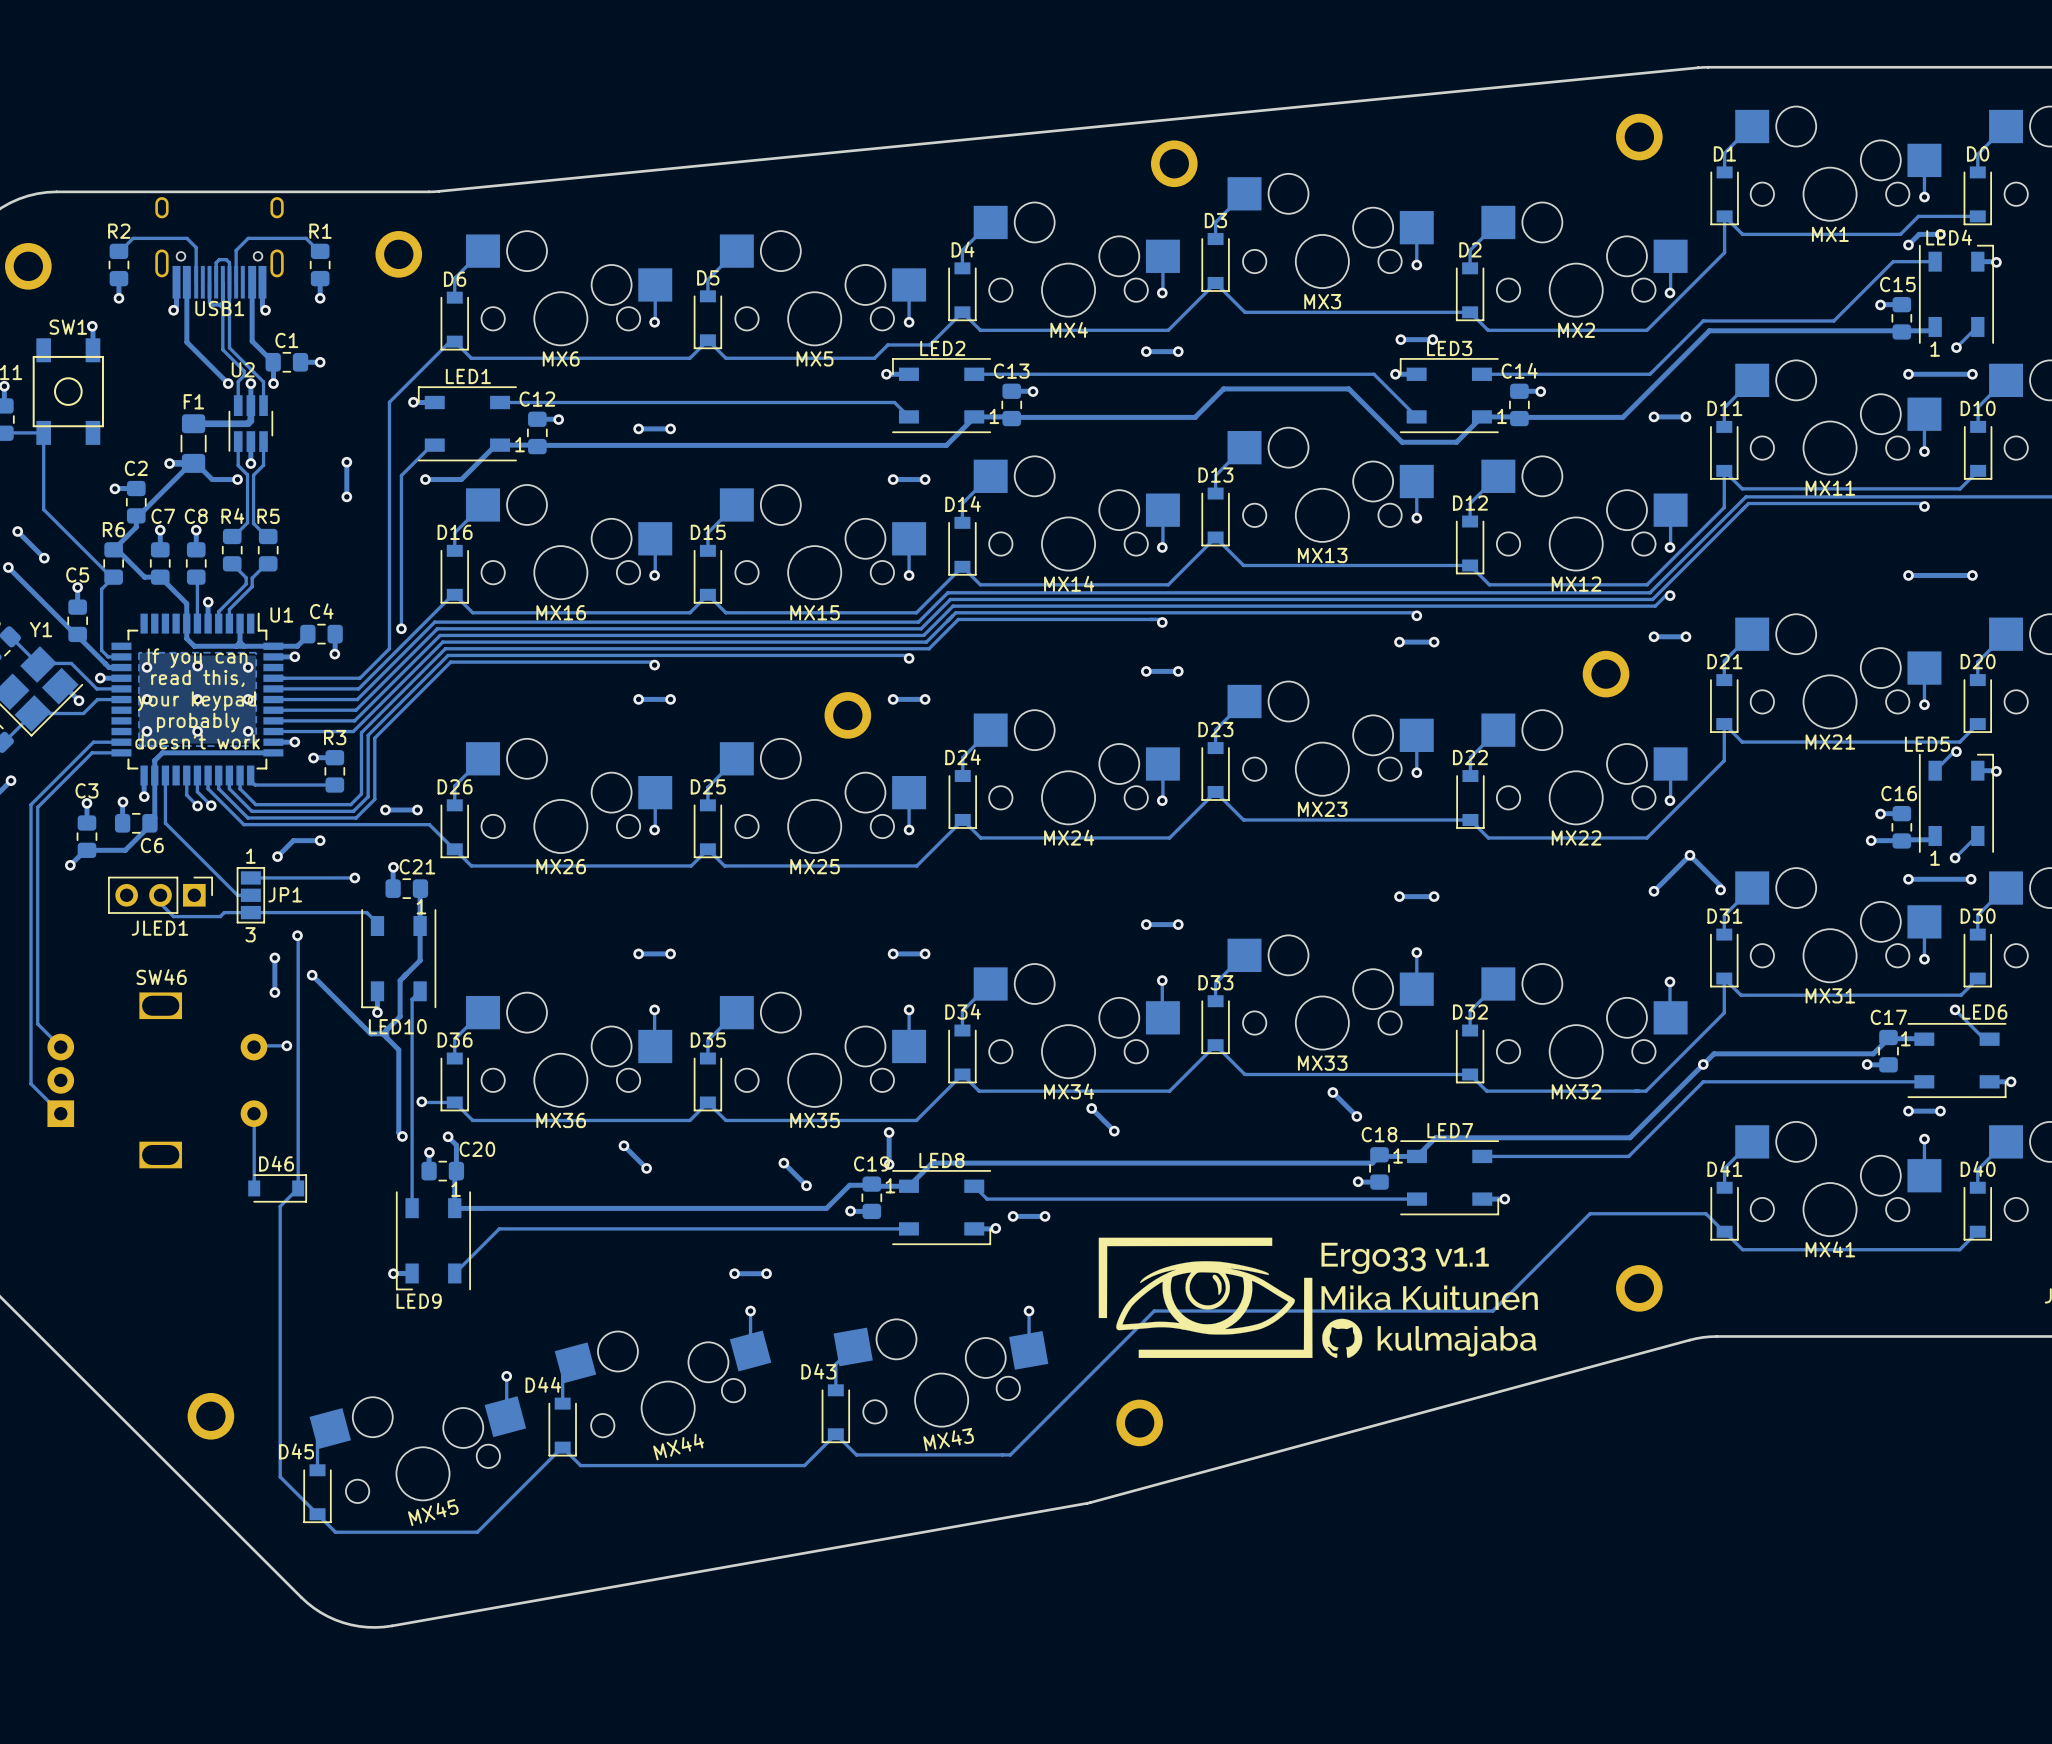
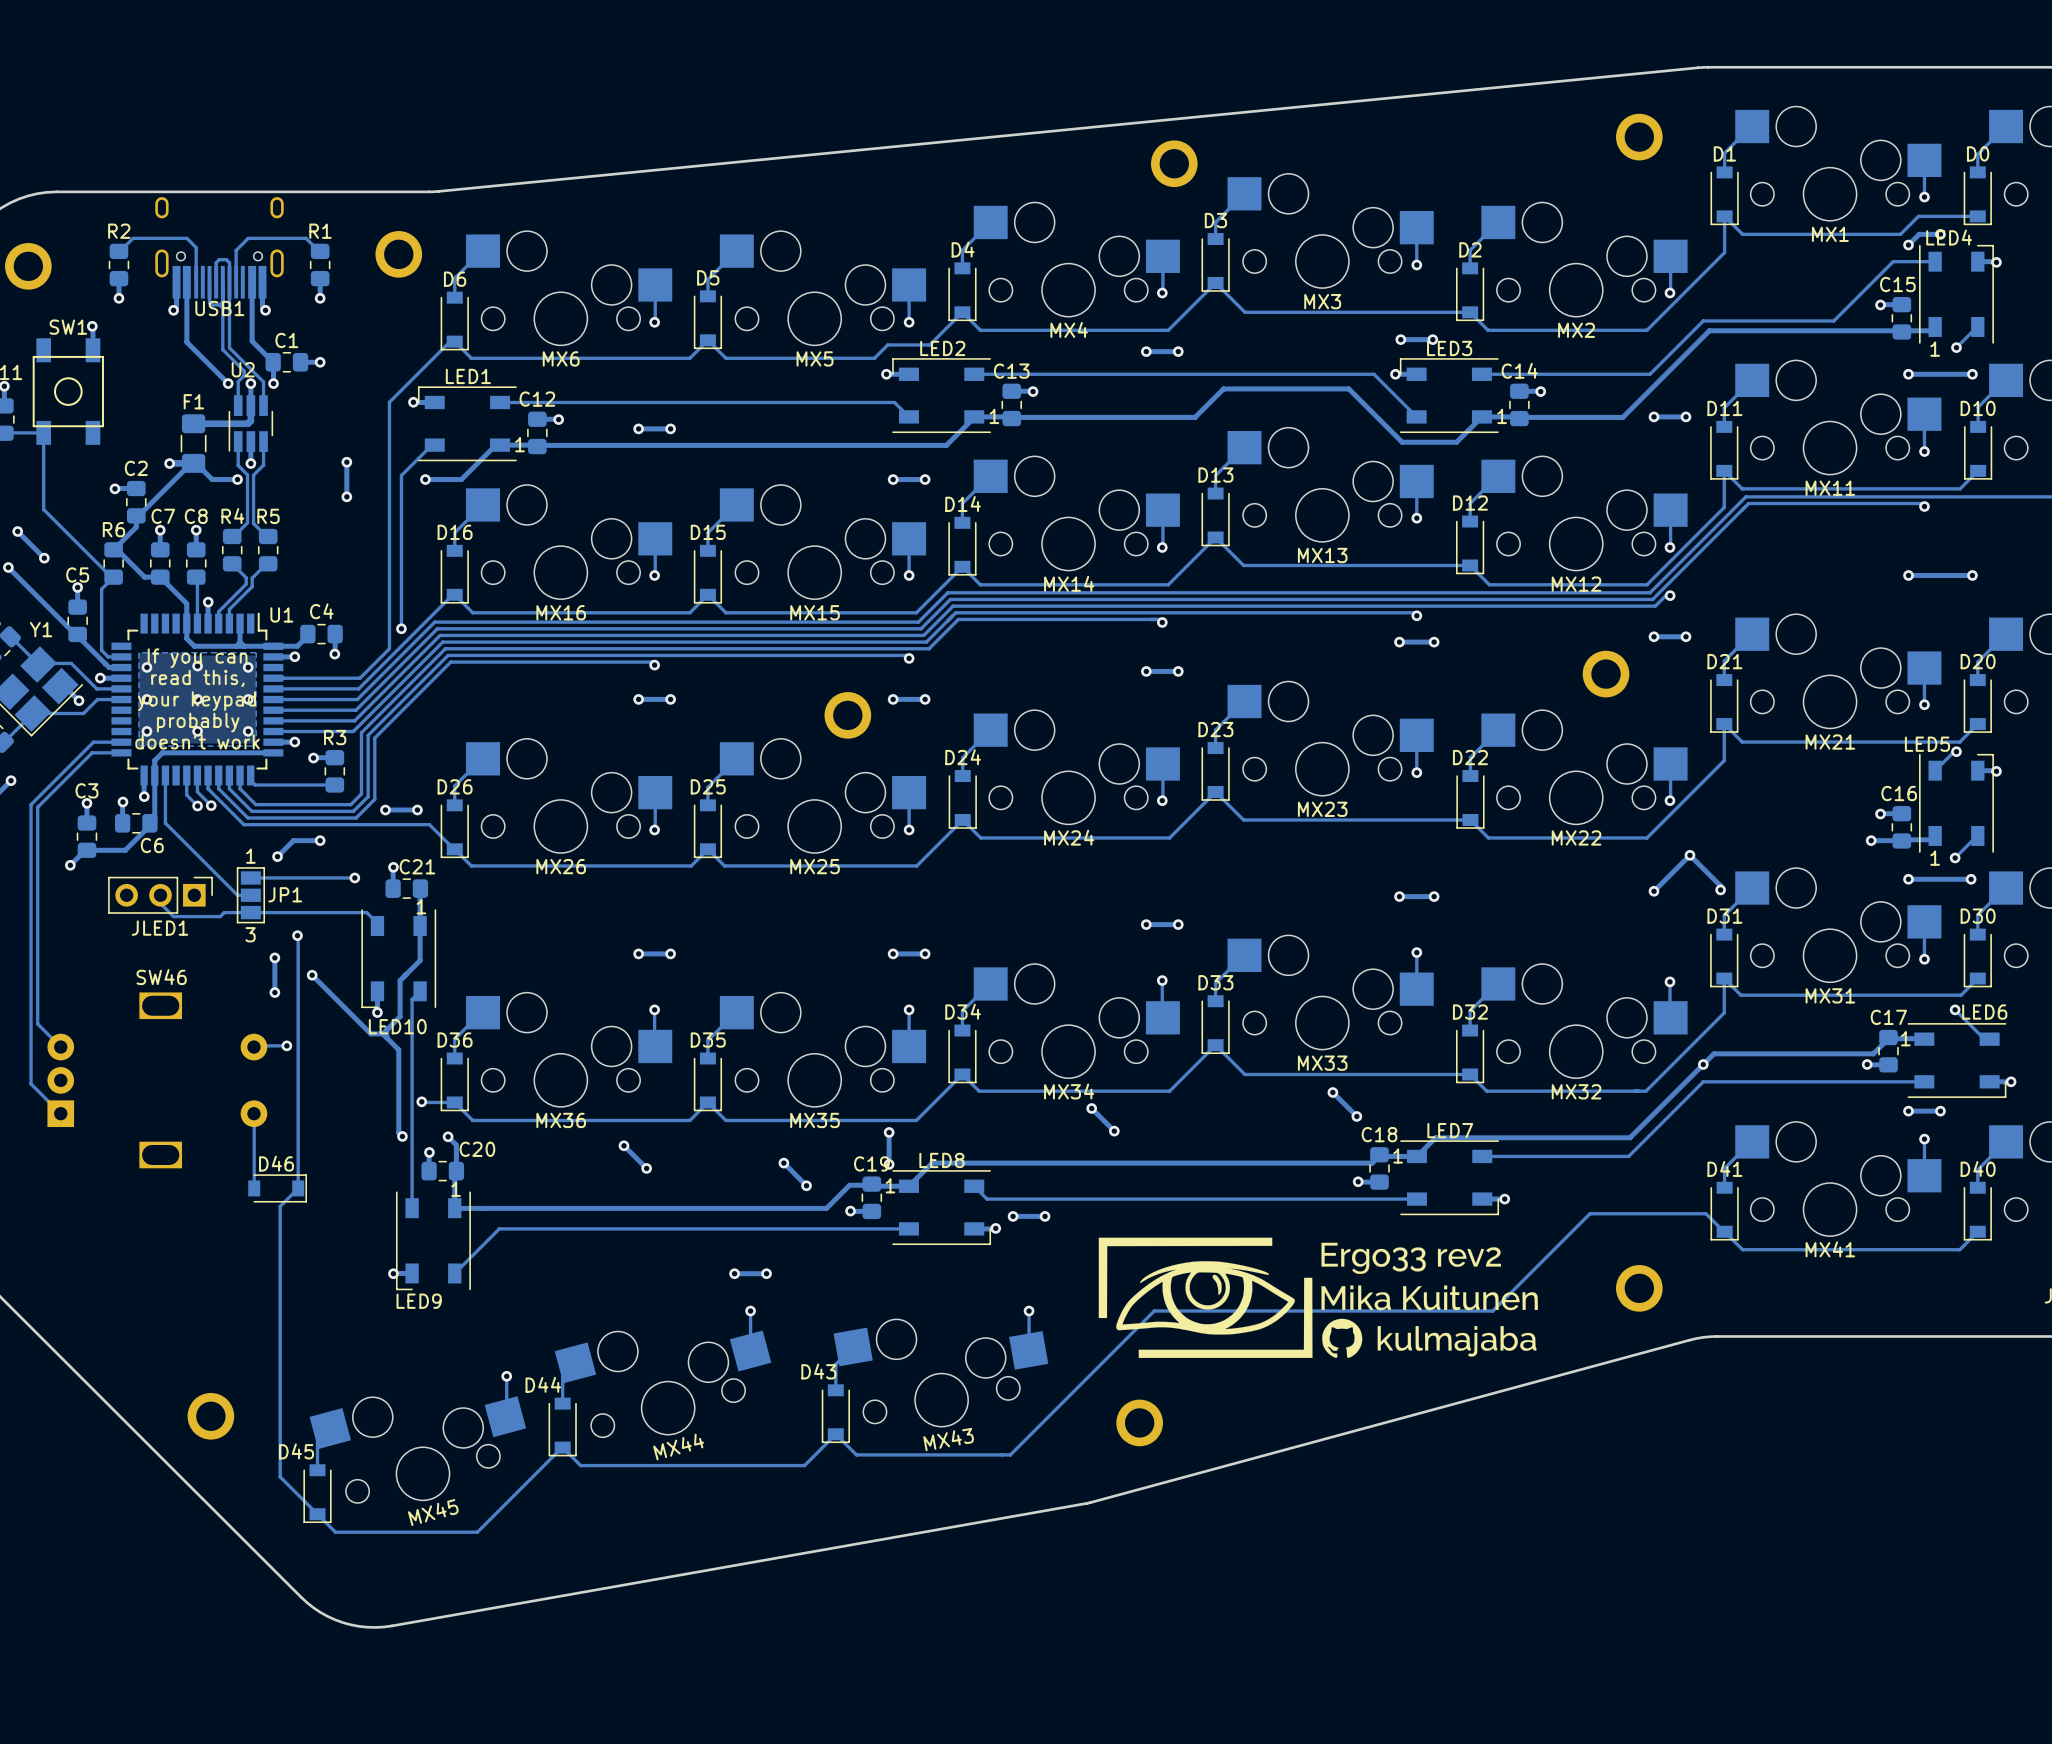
drawing shape: [1098, 1237, 1538, 1359] -> [1098, 1237, 1538, 1359]

